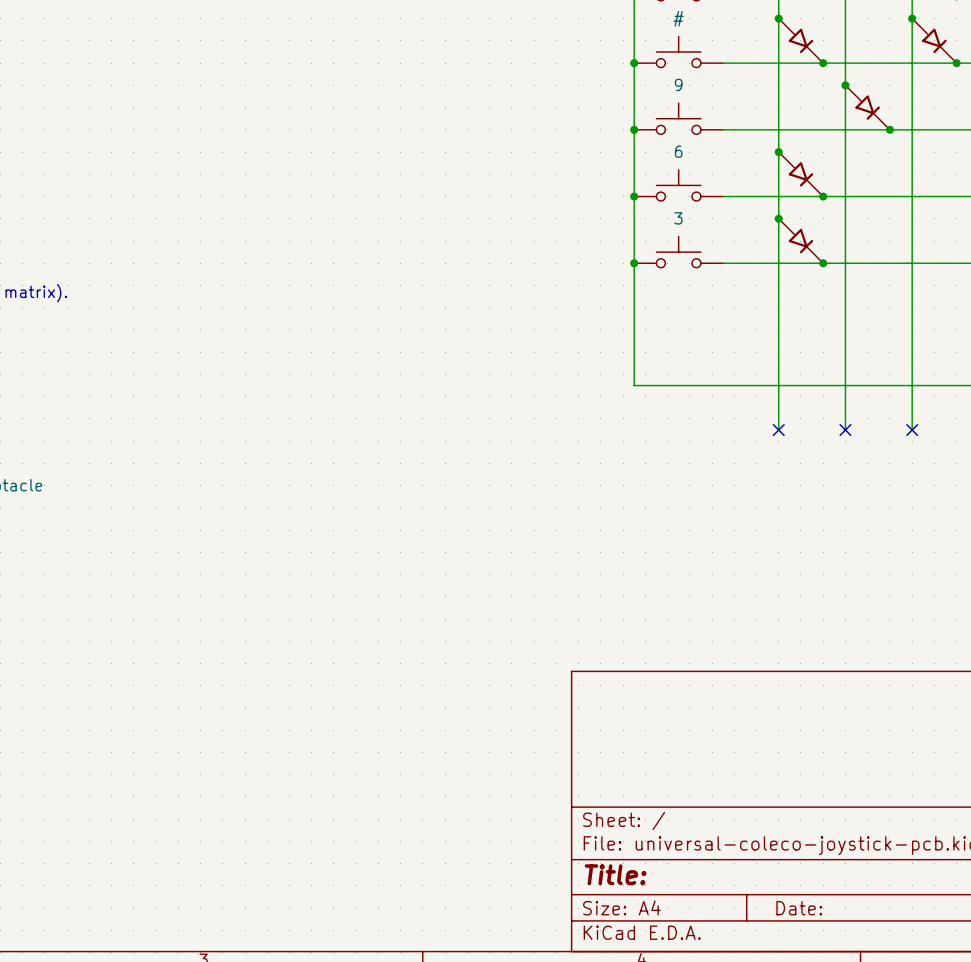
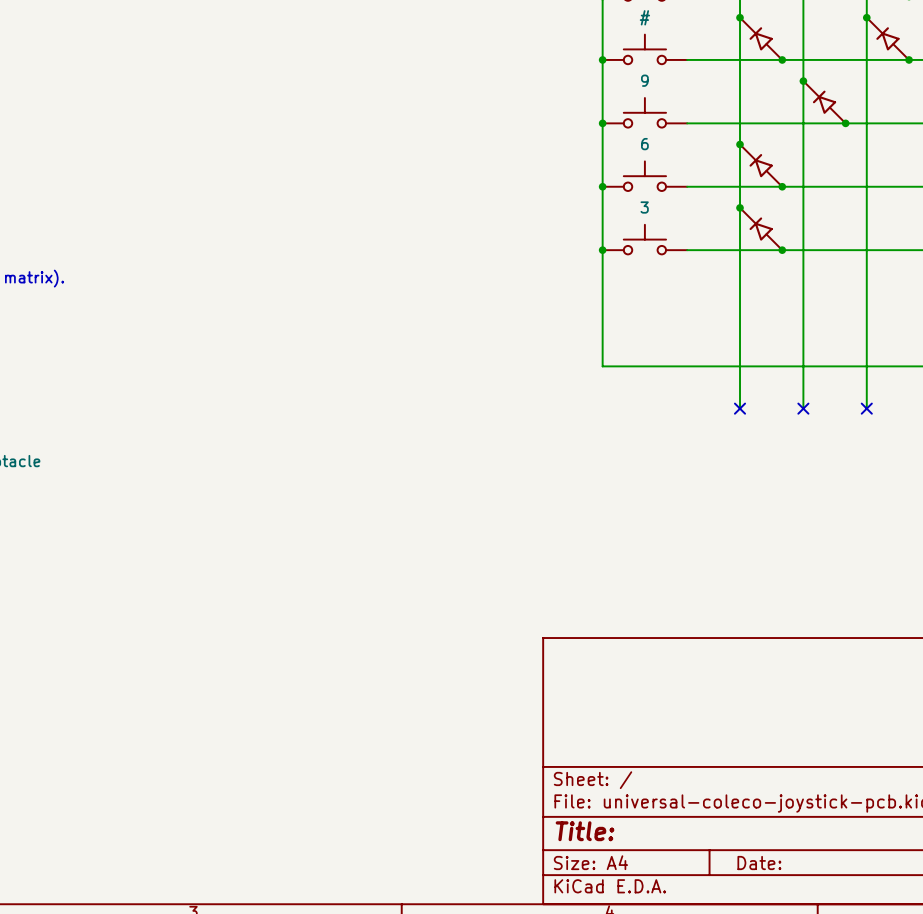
part rotation: 0° (800, 40) -> 180° (761, 38)
part rotation: 0° (934, 40) -> 180° (887, 38)
part rotation: 0° (867, 107) -> 180° (824, 102)
part rotation: 0° (800, 174) -> 180° (761, 165)
part rotation: 0° (800, 241) -> 180° (761, 229)

